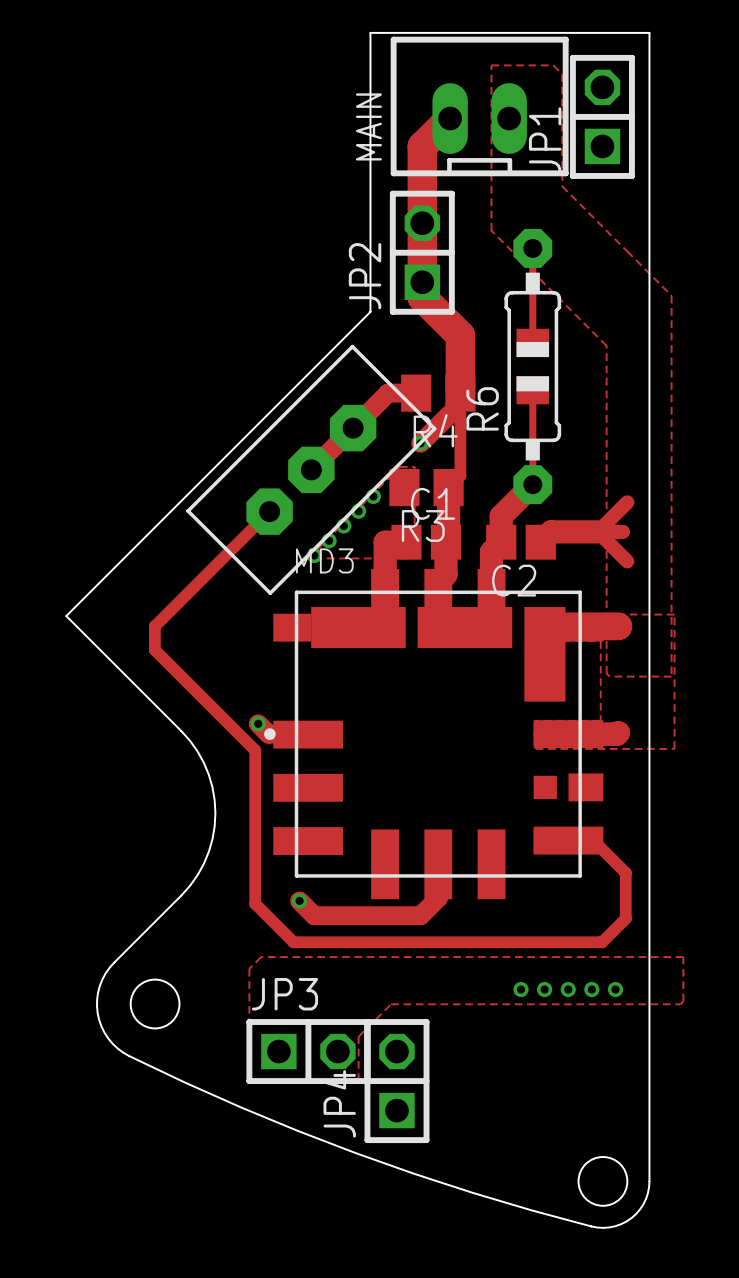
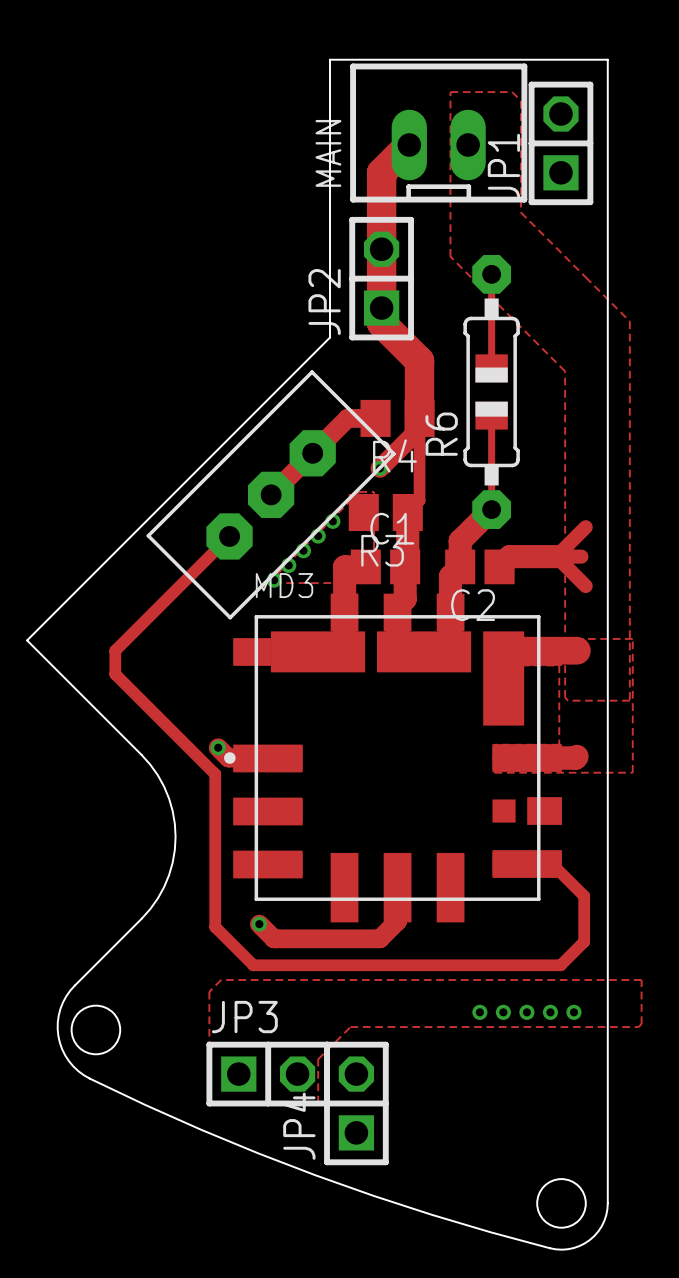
round board edge position: (155, 1004) -> (95, 1029)

